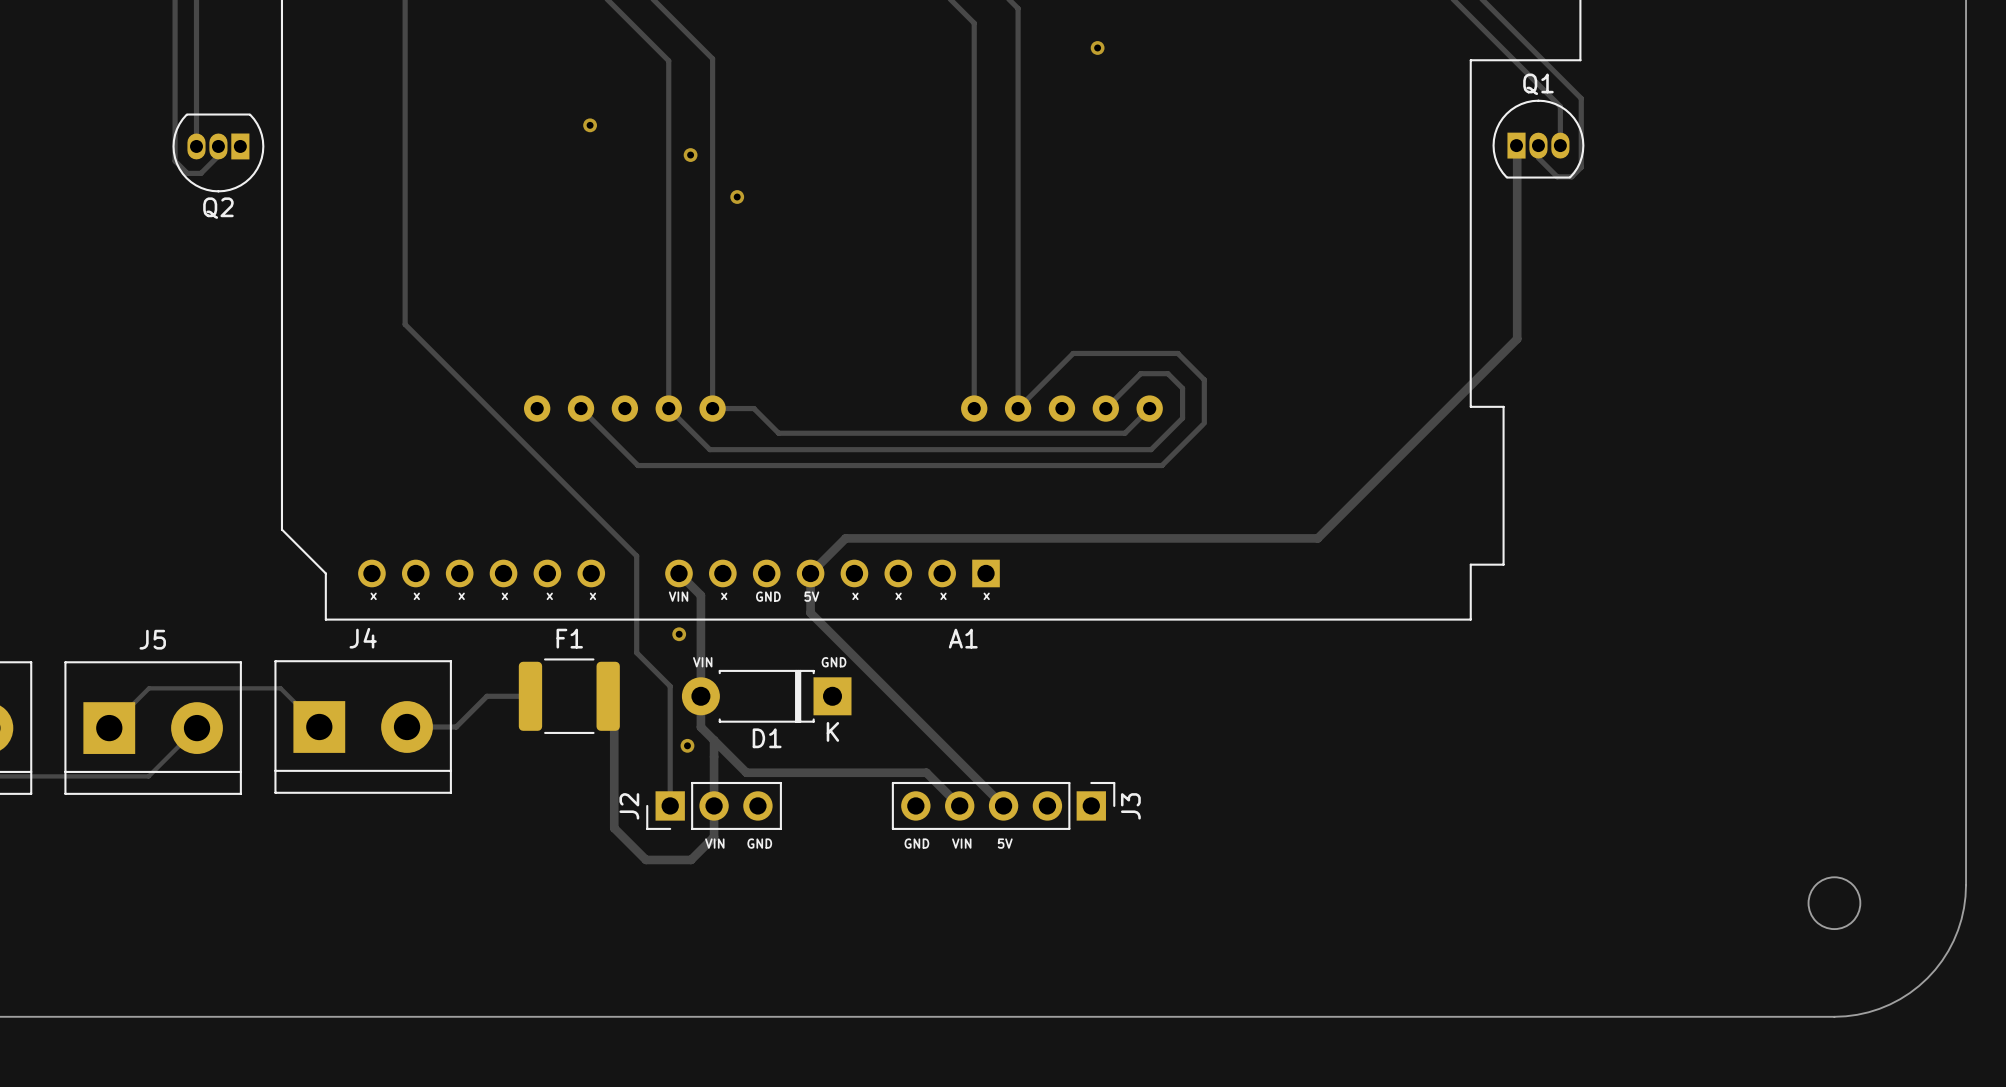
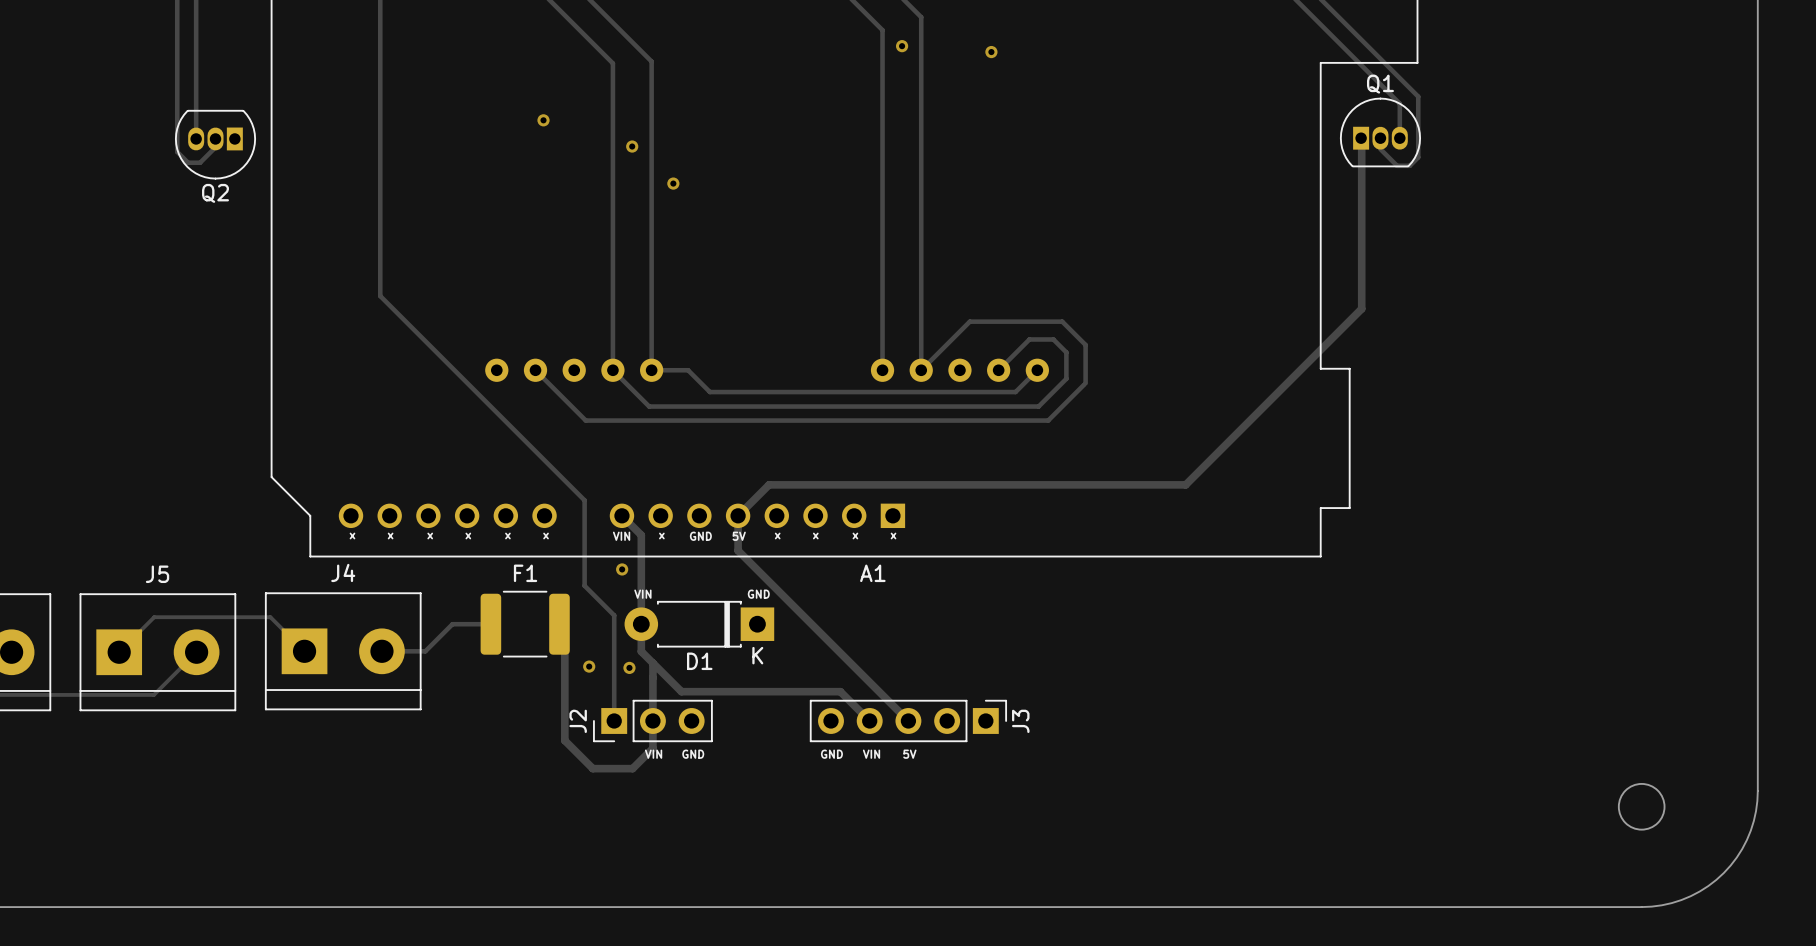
via: none -> (902, 46)
via: none -> (589, 666)

